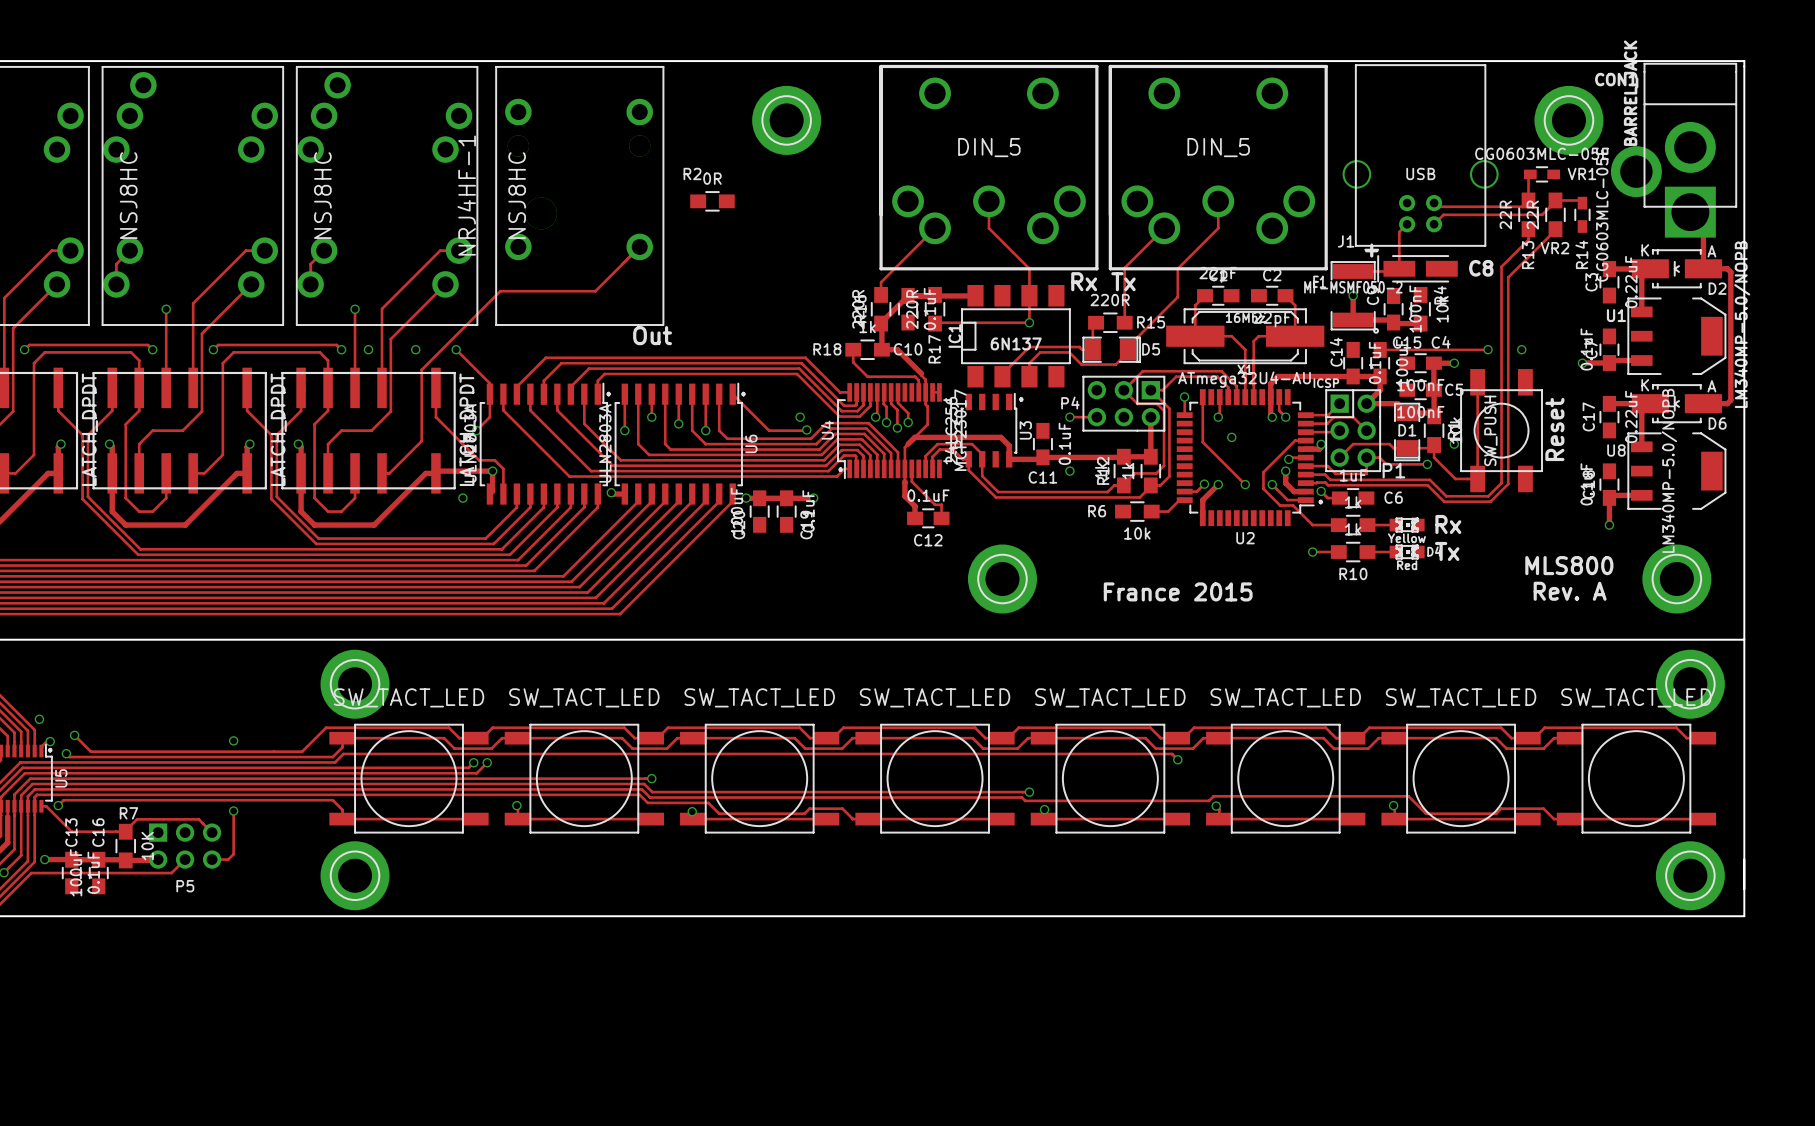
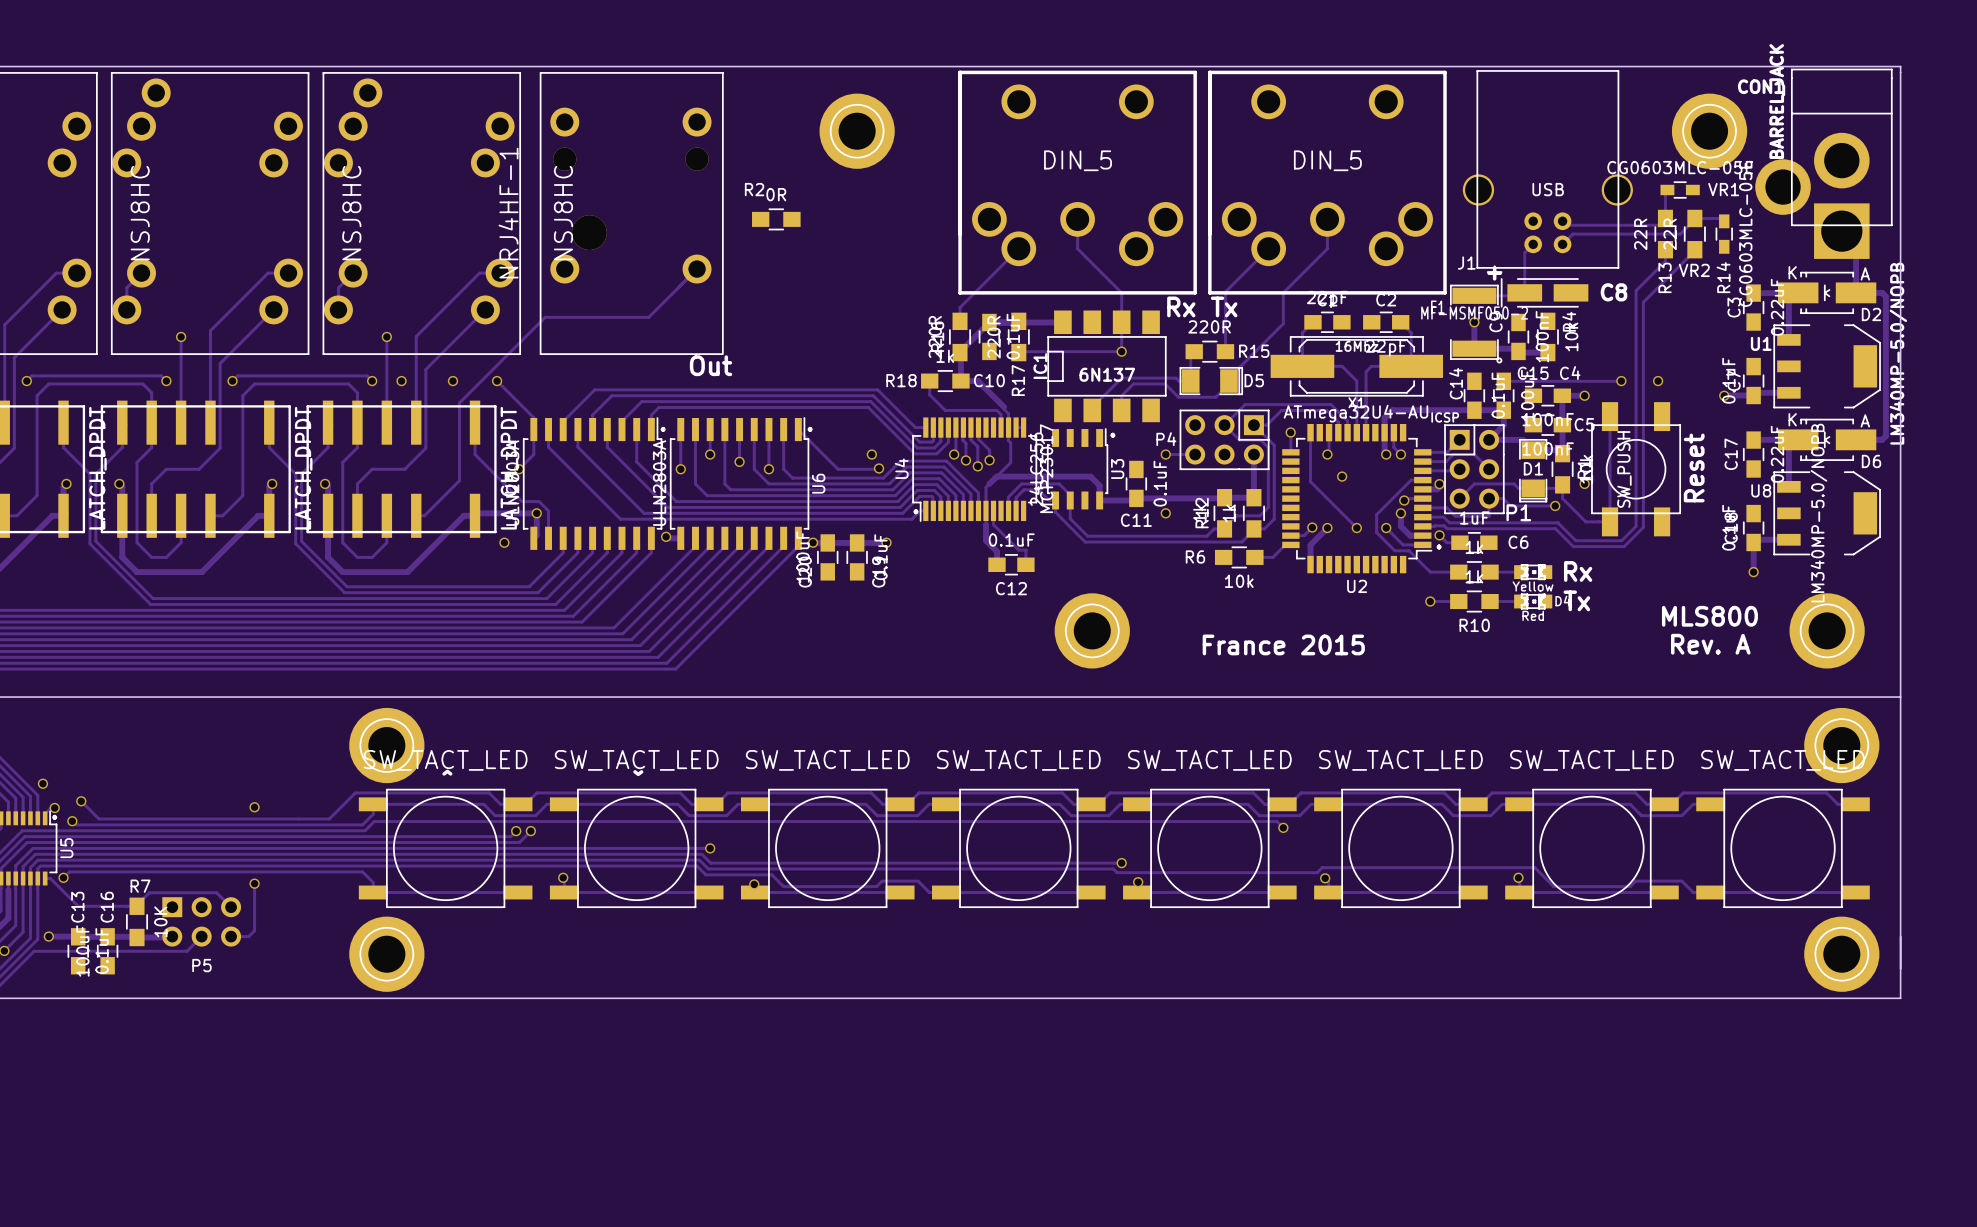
text: none -> ^ (447, 772)
text: none -> ^ (638, 773)

